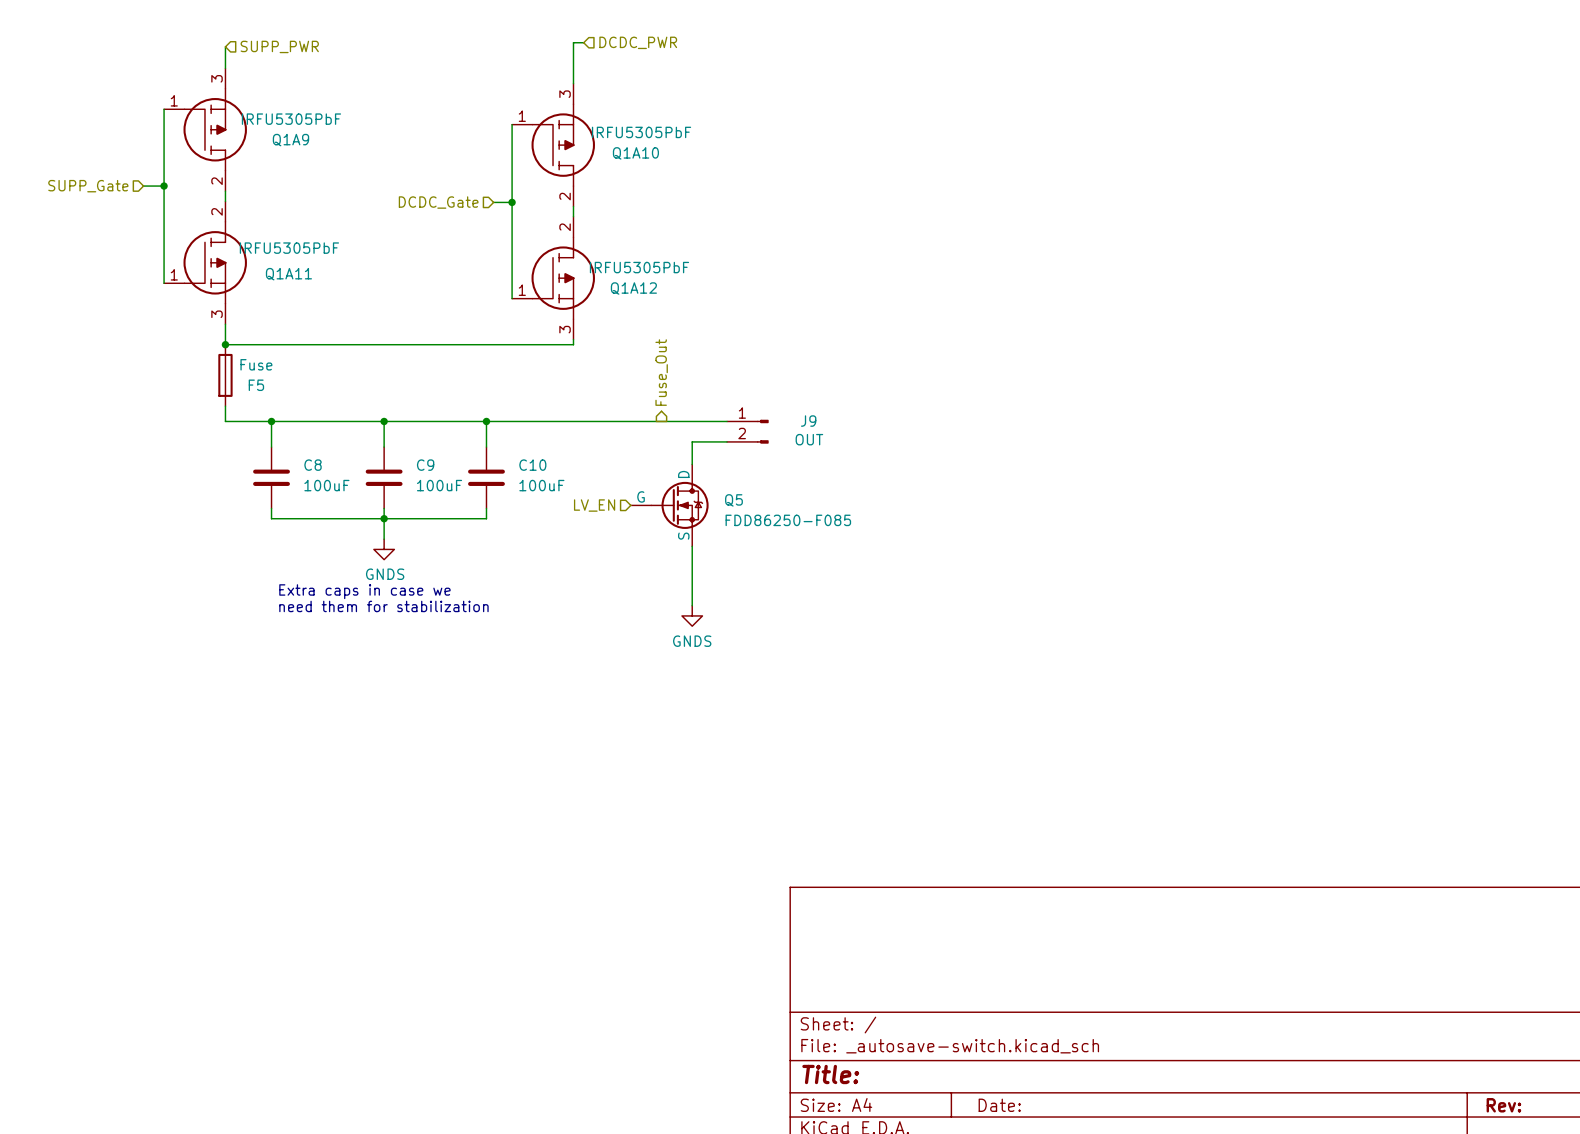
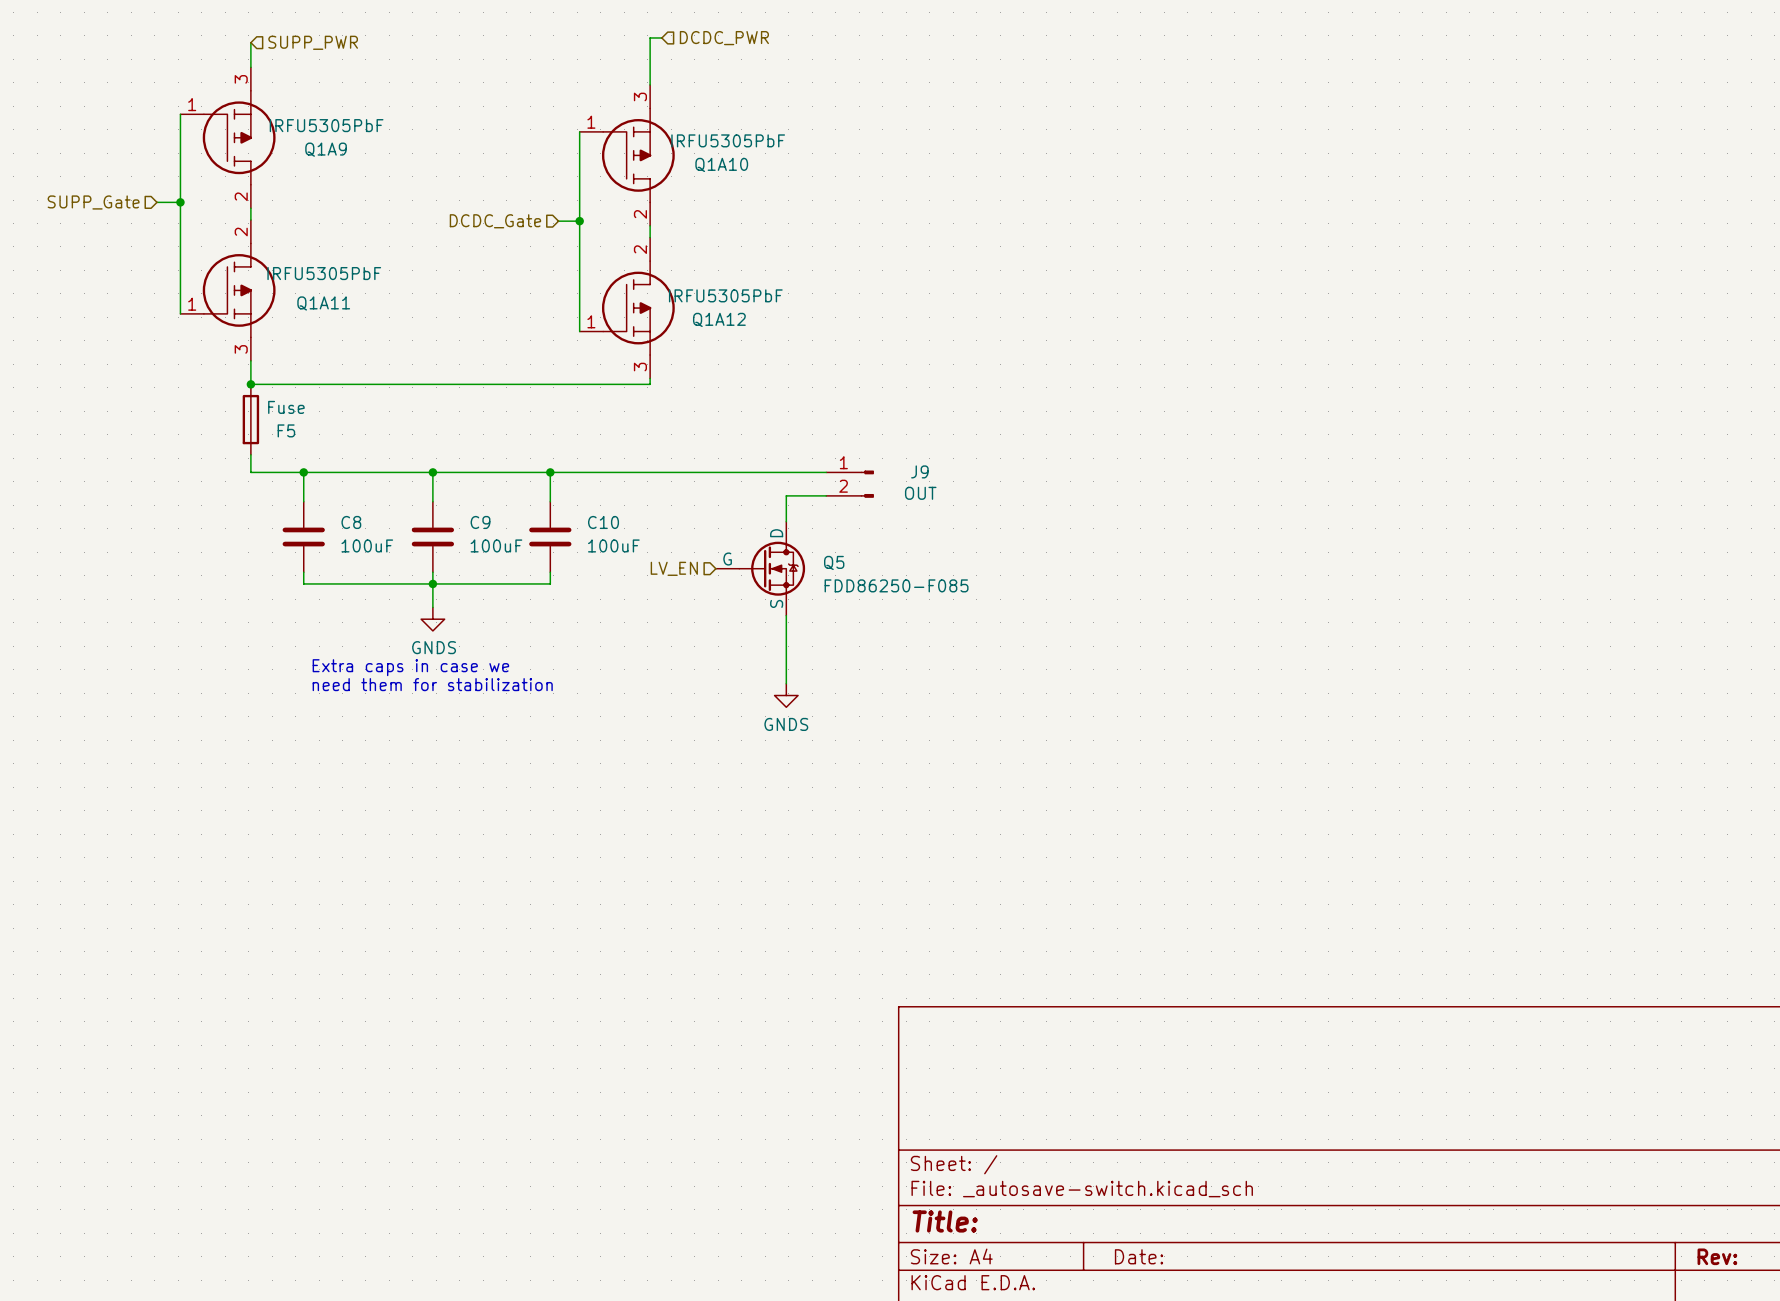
hierarchical label: Fuse_Out (661, 372) -> none

